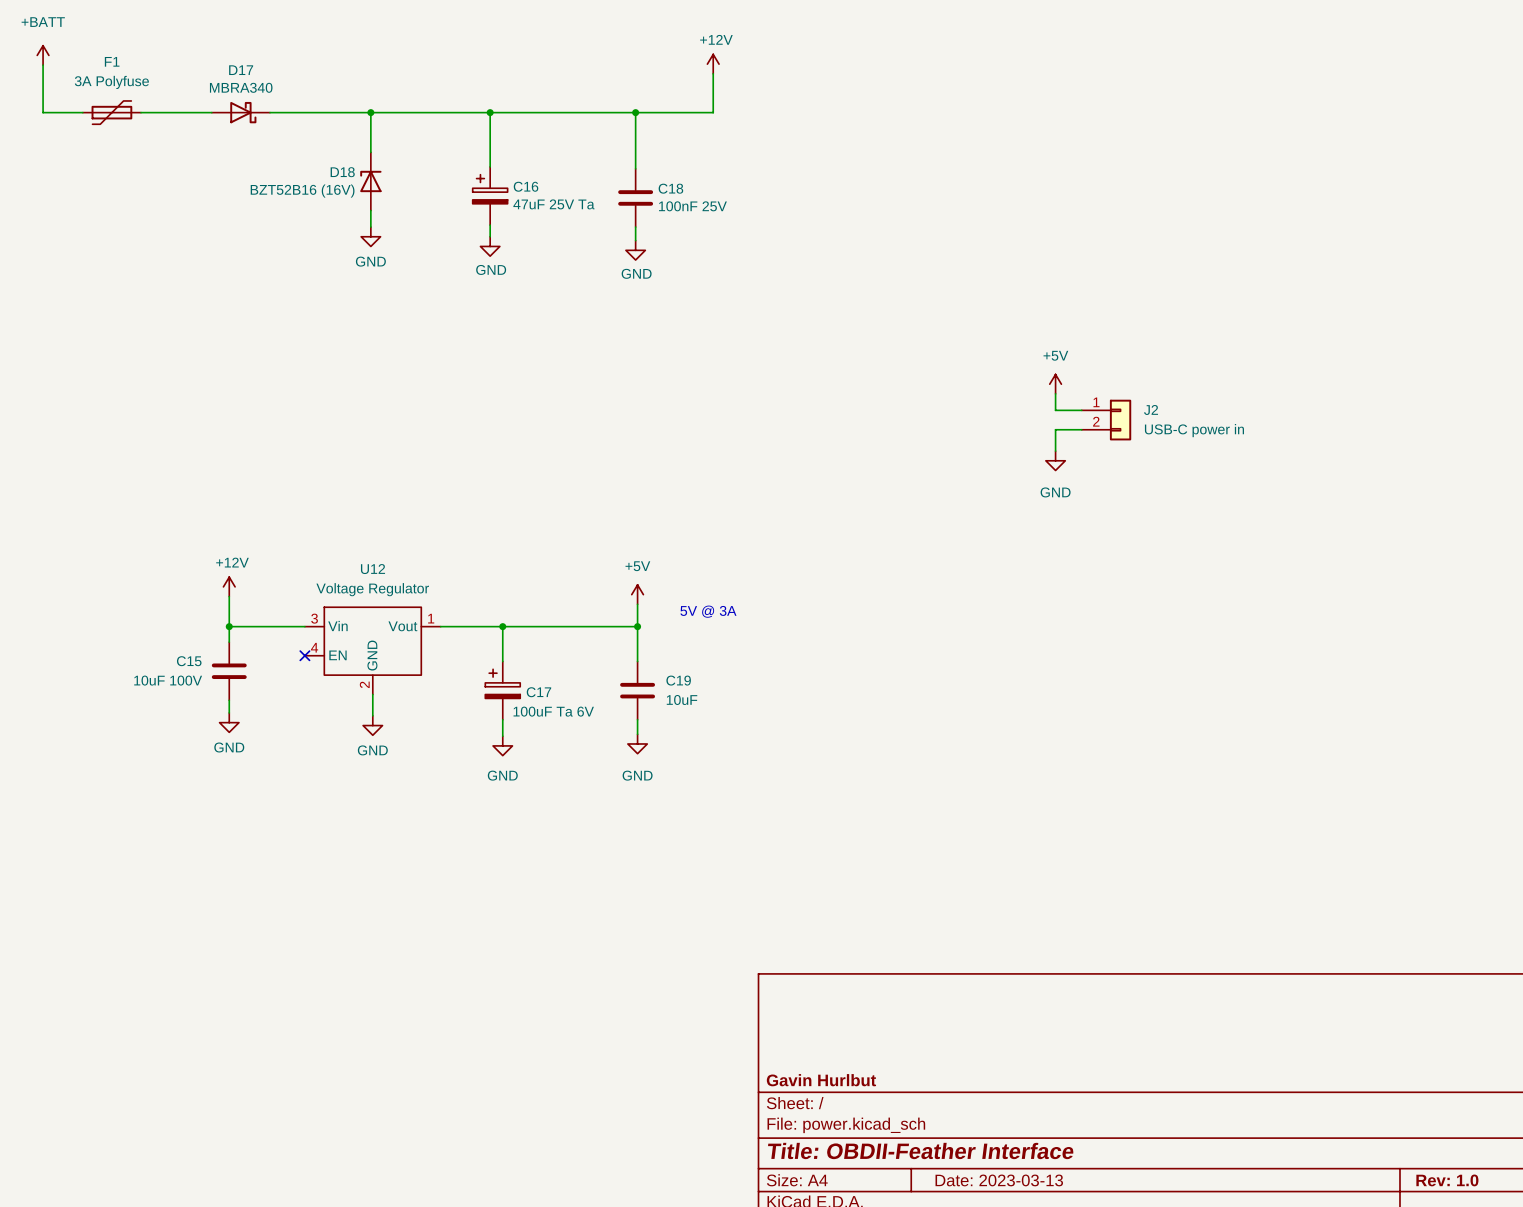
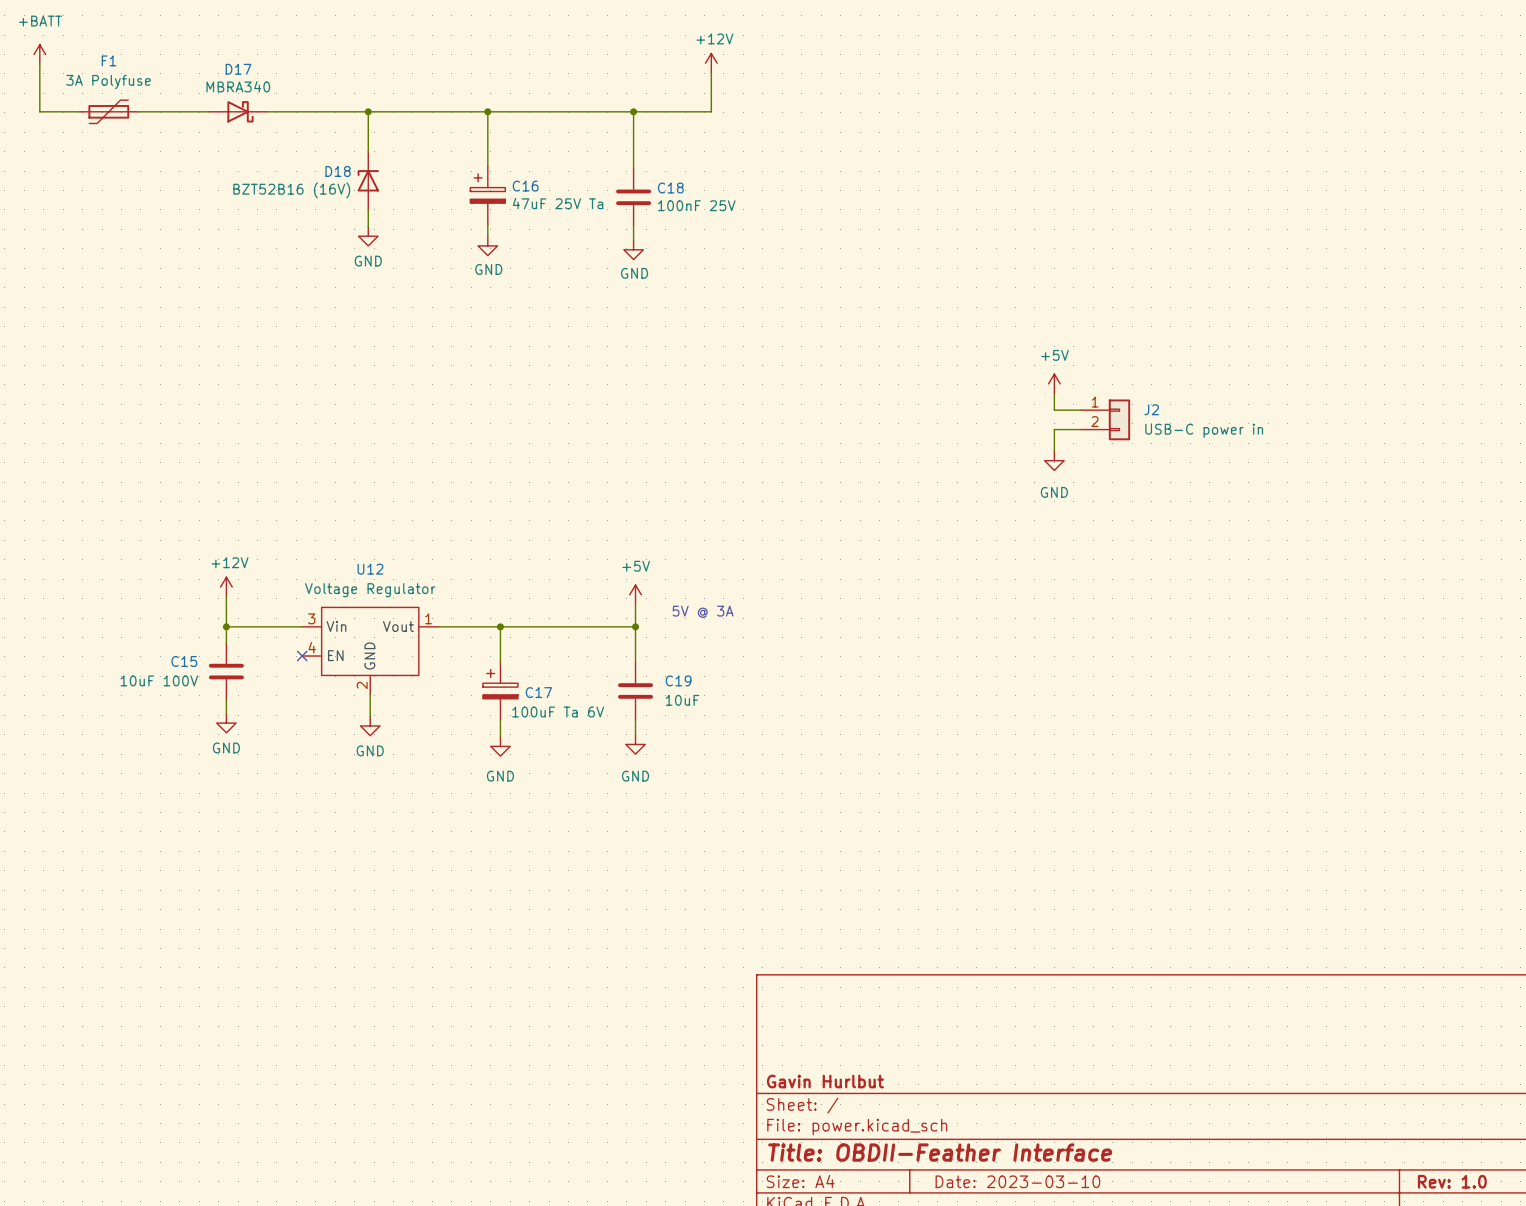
title block: Date: 2023-03-13 (999, 1180) -> Date: 2023-03-10 (1017, 1181)

